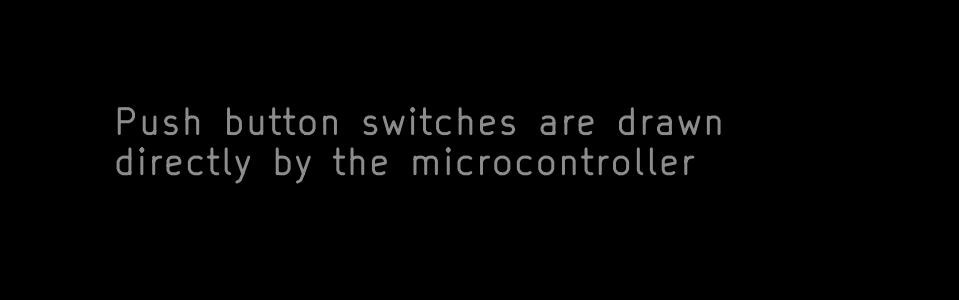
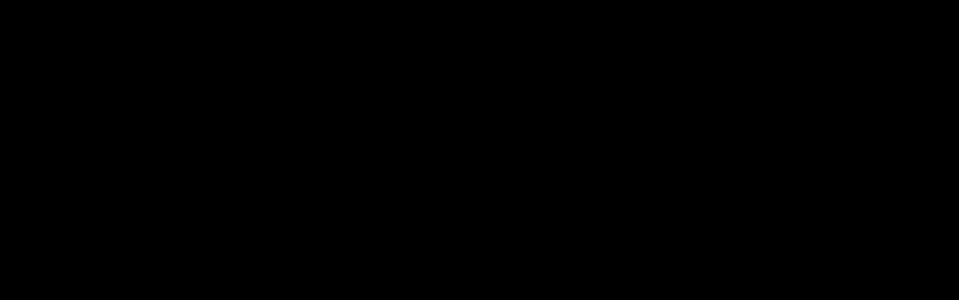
text: Push button switches are drawn (419, 121) -> none
text: directly by the microcontroller (405, 165) -> none

